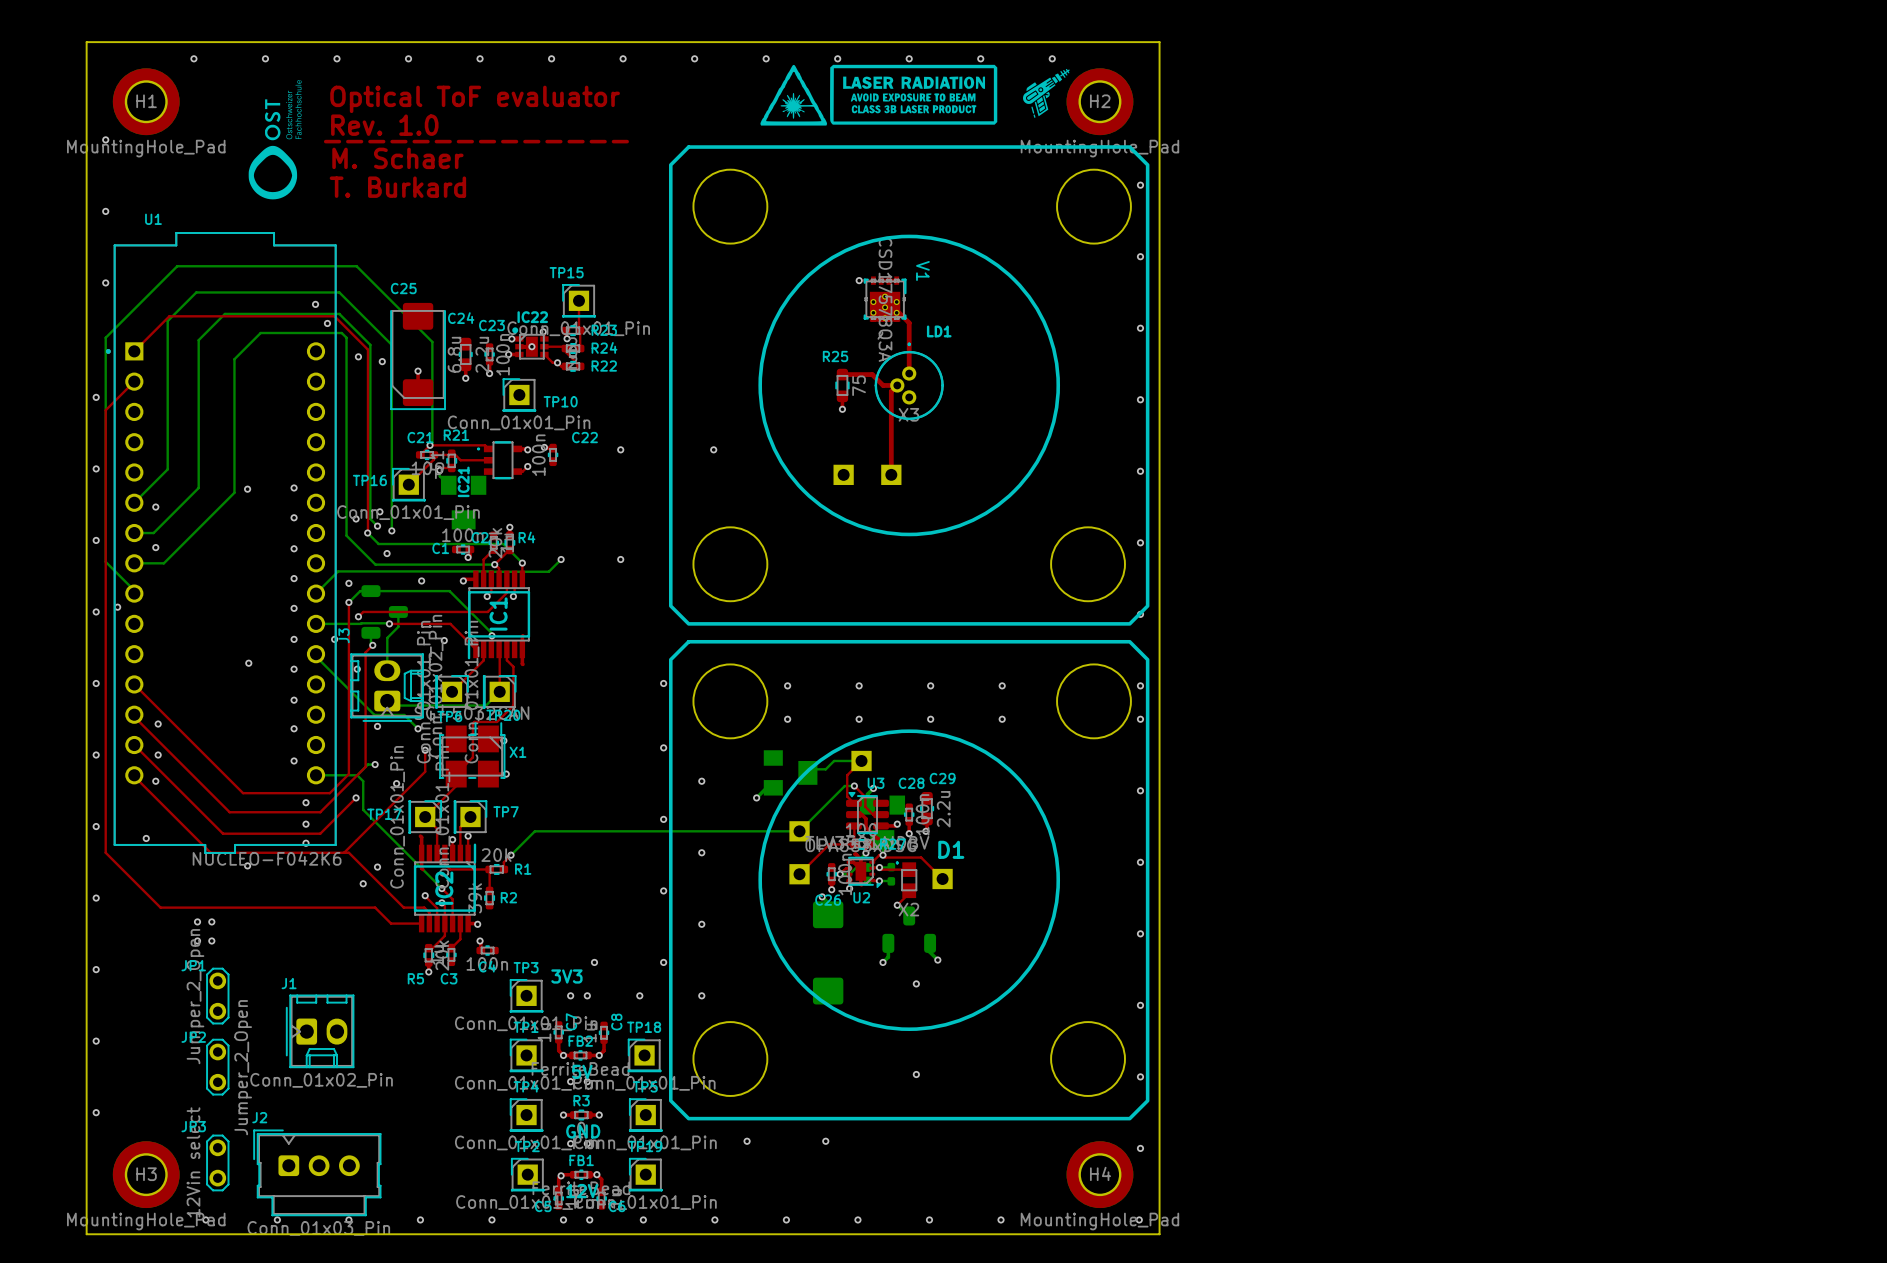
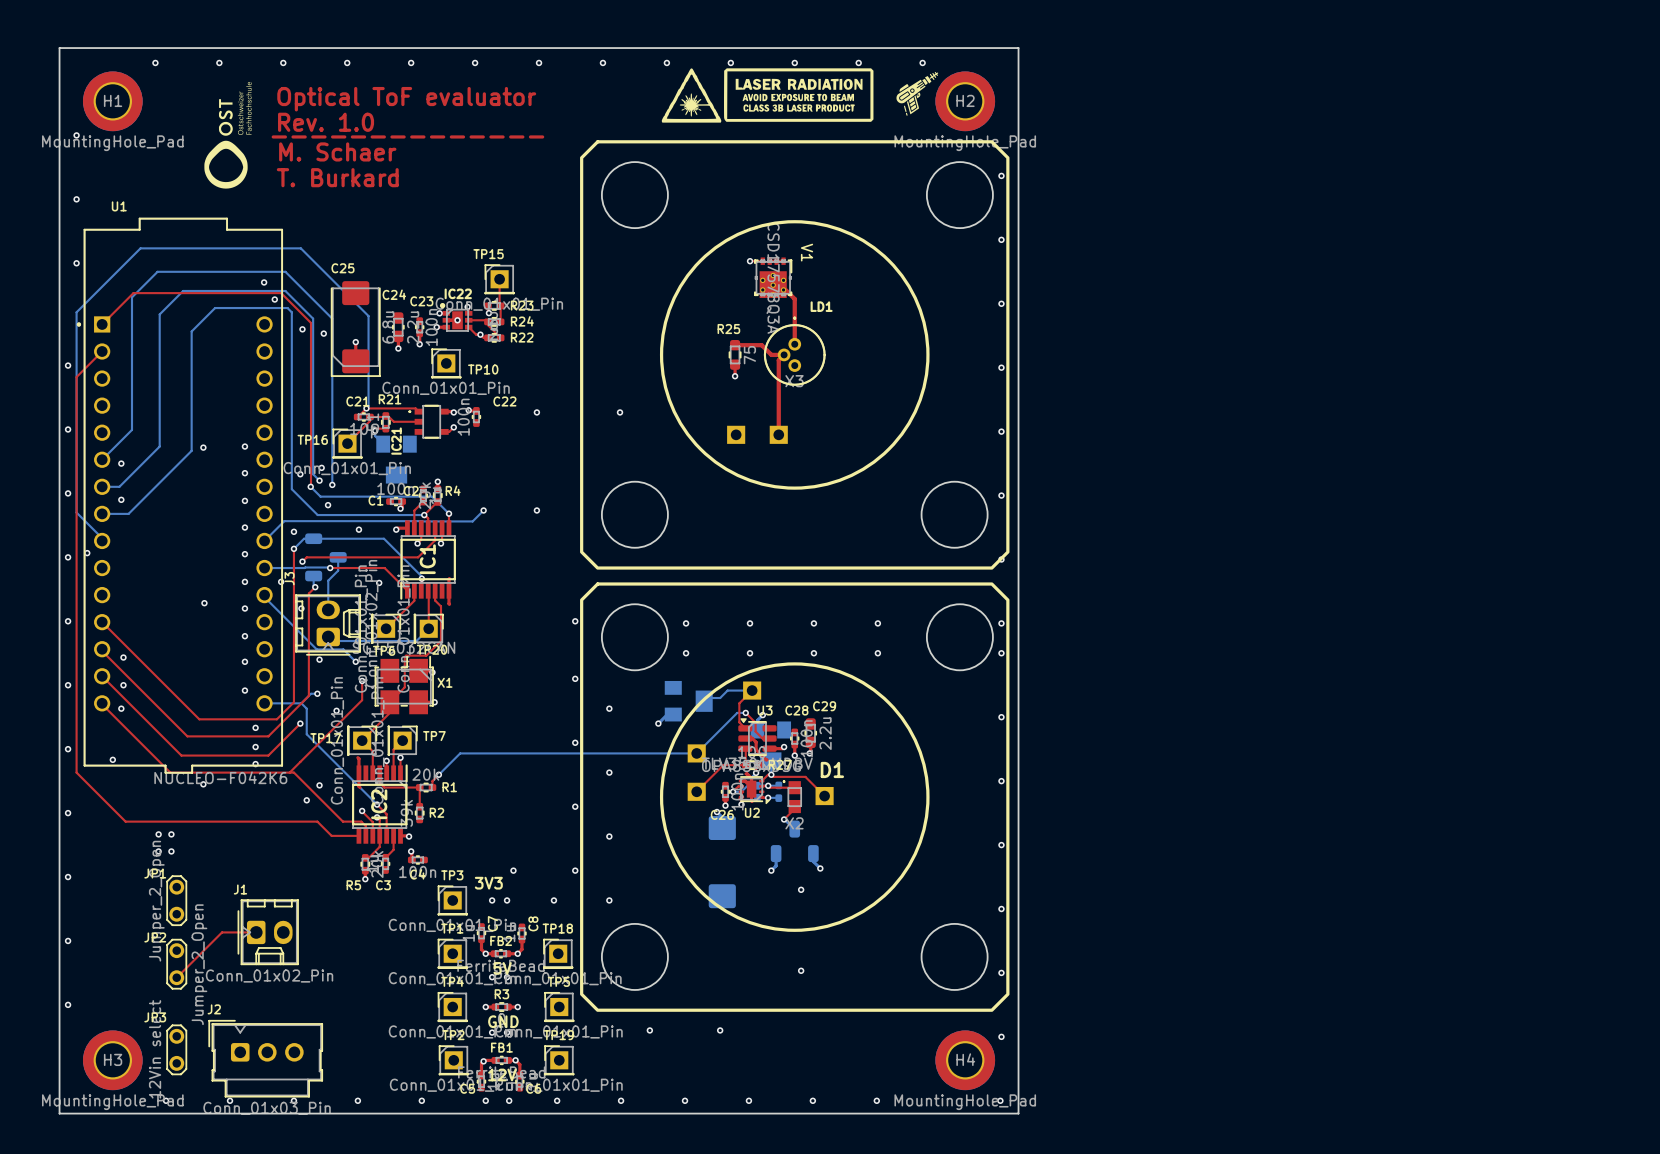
top track: none -> (256, 932) (222, 932) (176, 977)

